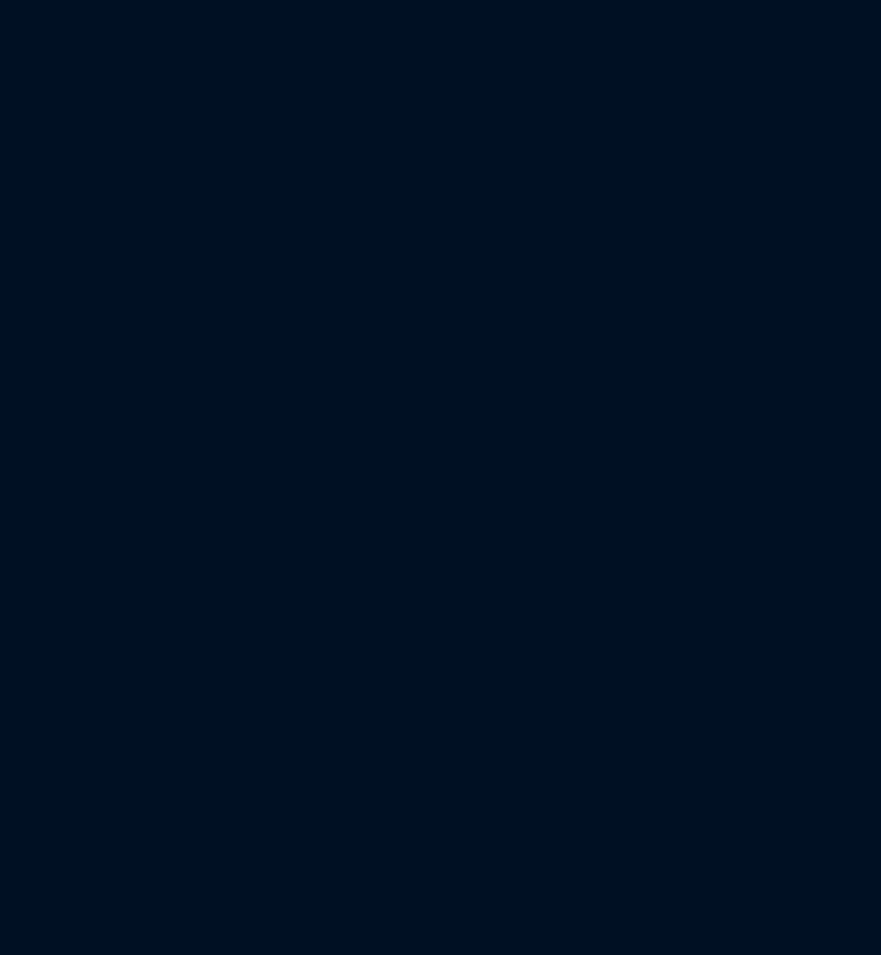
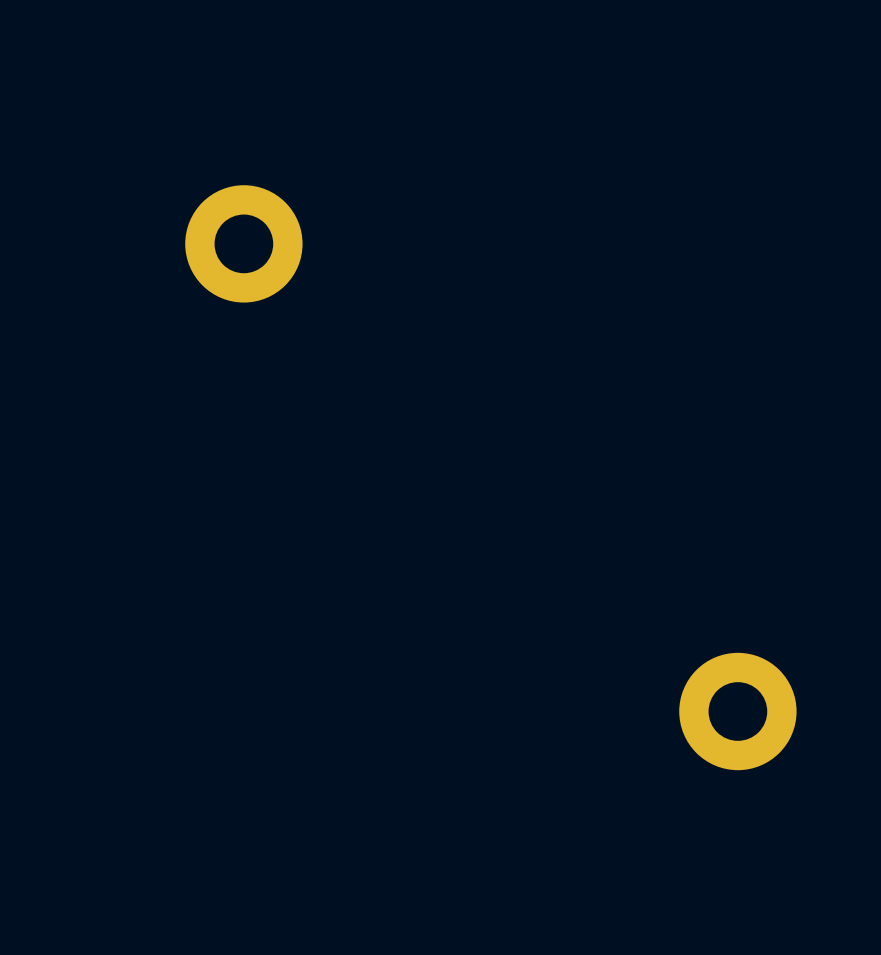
part: none -> (243, 243)
part: none -> (737, 711)

